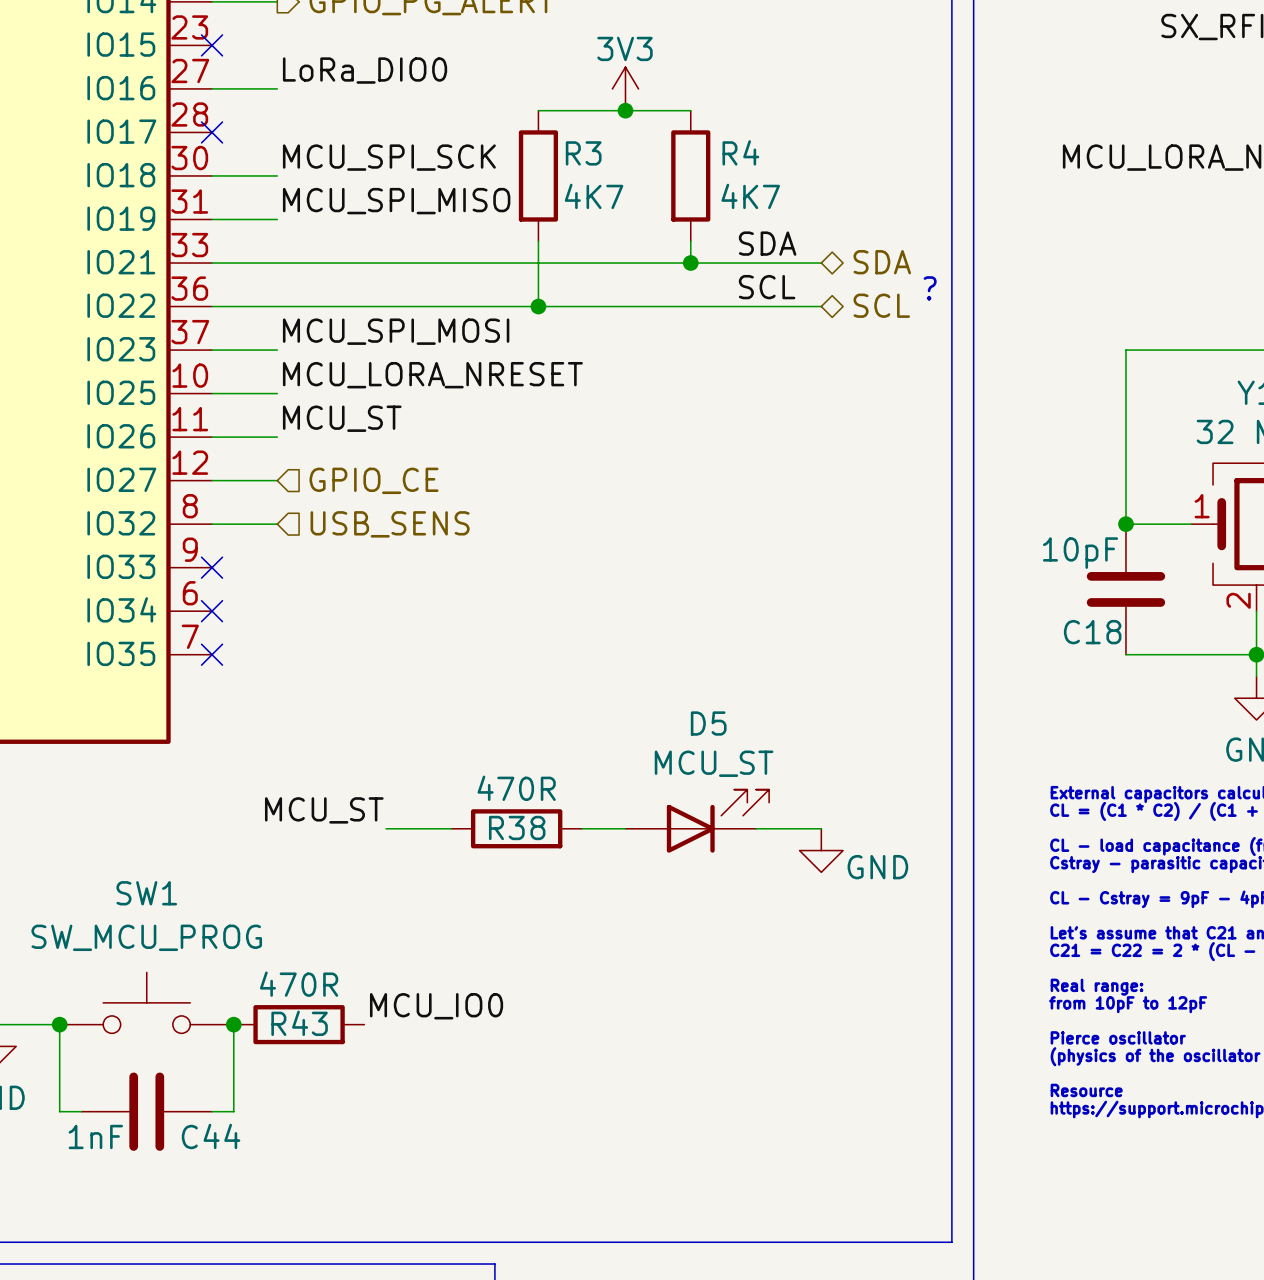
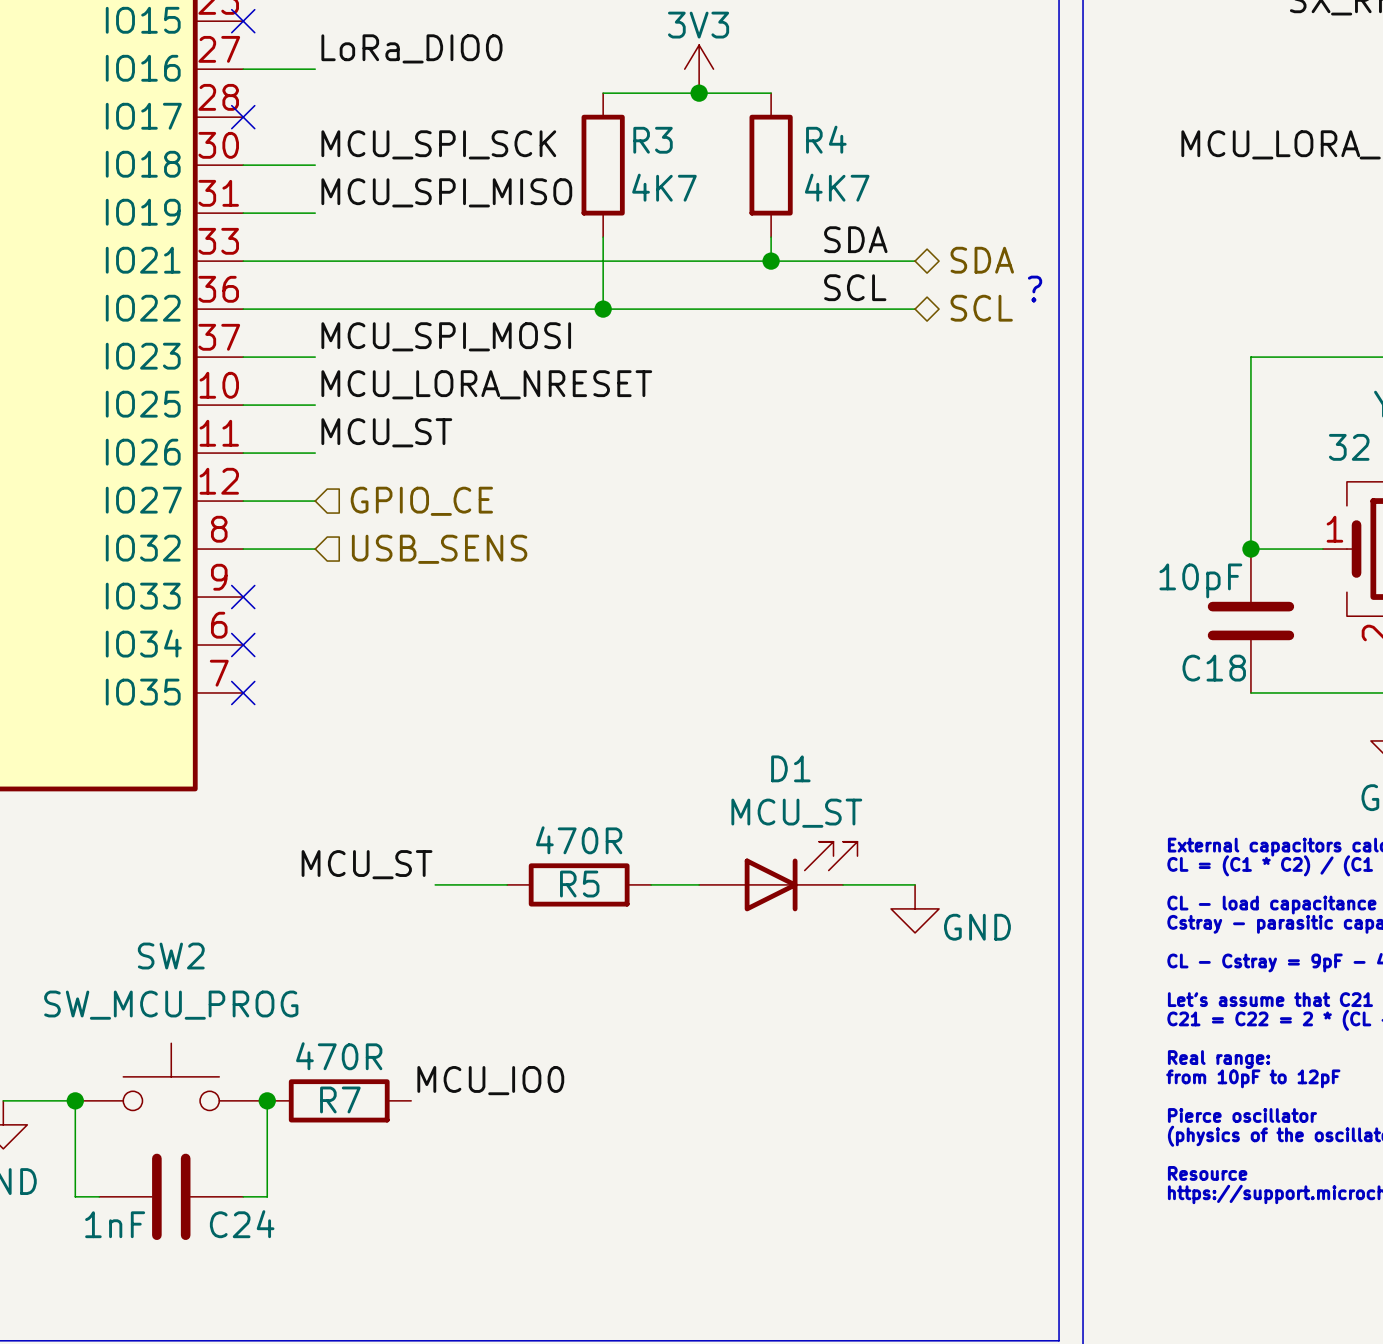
D5 name: D5 (708, 723) -> D1 (790, 768)
R38 name: R38 (517, 827) -> R5 (579, 884)
SW1 name: SW1 (146, 893) -> SW2 (171, 956)
R43 name: R43 (299, 1023) -> R7 (340, 1099)
C44 name: C44 (211, 1136) -> C24 (242, 1224)

